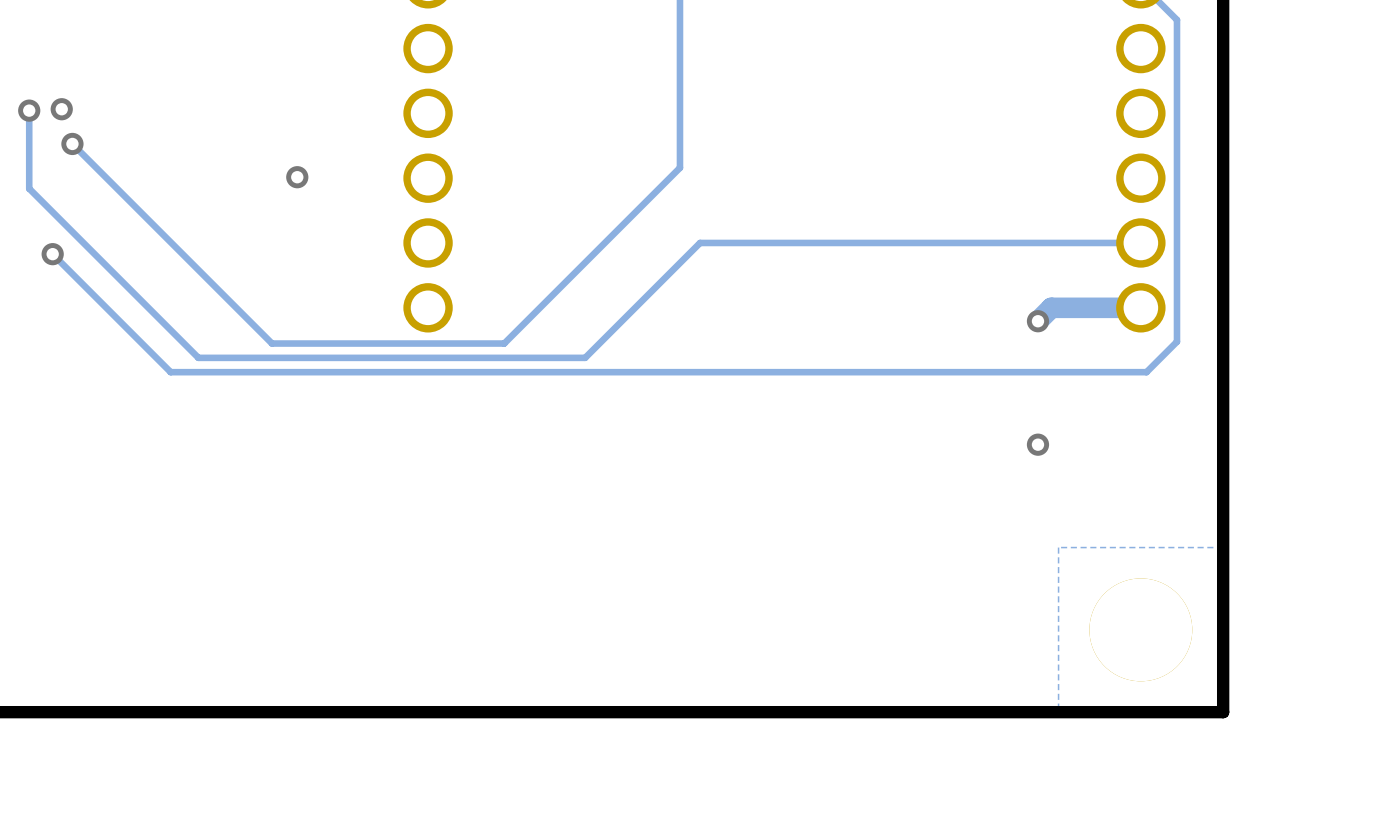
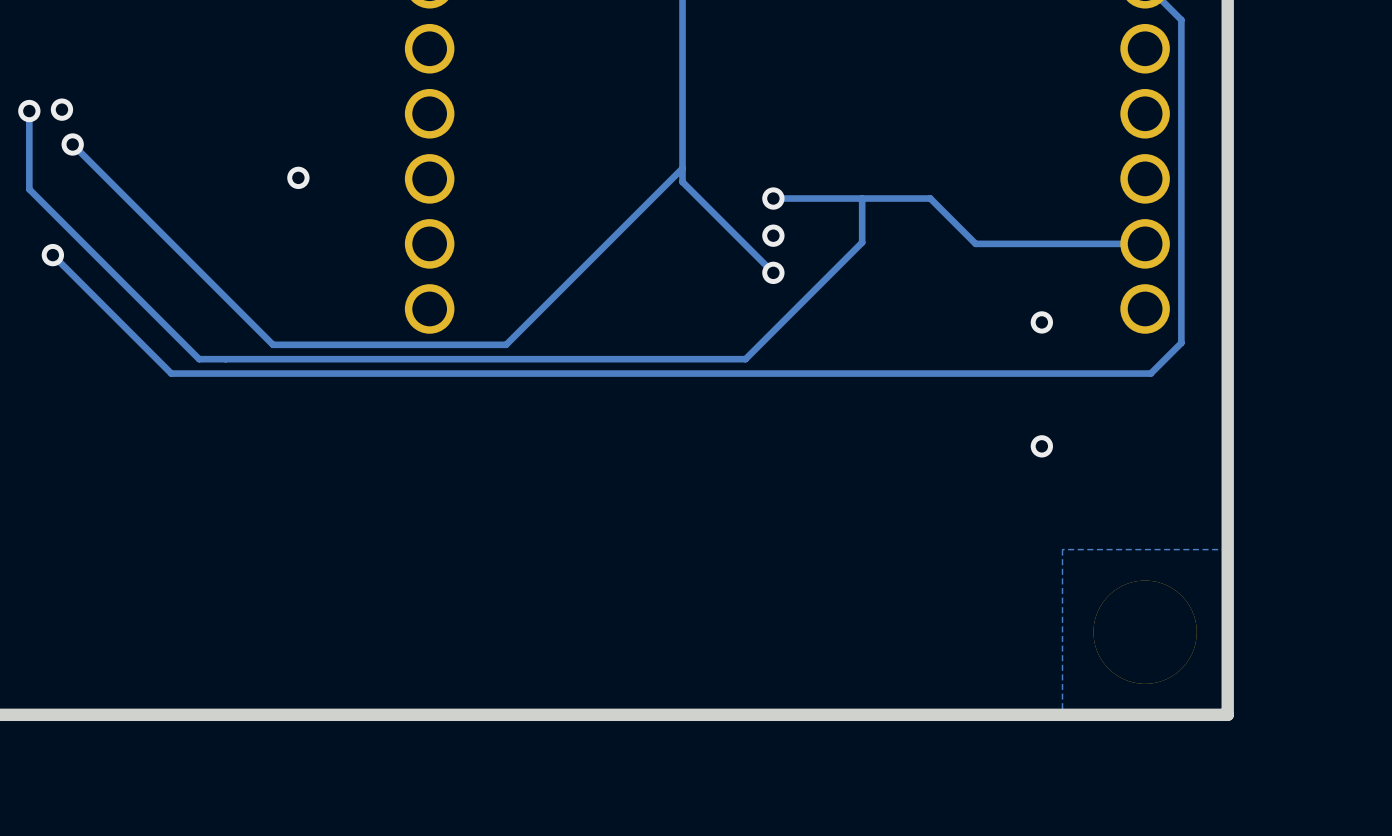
track: none -> (682, 168) (682, 182) (773, 272)
track: none -> (773, 198) (930, 198) (975, 243)
via: none -> (773, 198)
via: none -> (773, 235)
track: (972, 242) (700, 242) (585, 357) -> (862, 198) (862, 242) (745, 359) (587, 359)
via: none -> (773, 272)
track: (1140, 307) (1051, 307) (1037, 321) -> none

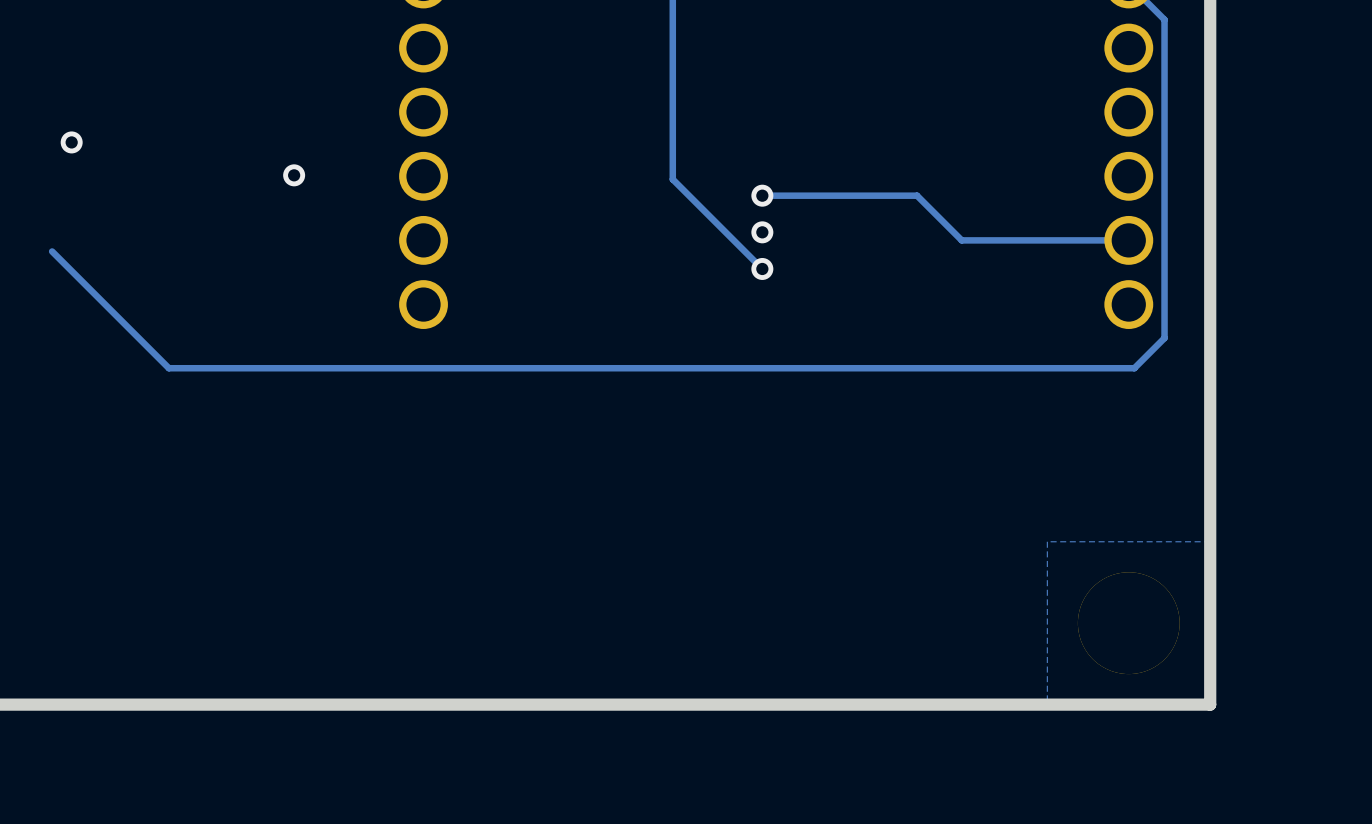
via: (61, 109) -> none
track: (29, 111) (29, 189) (199, 359) (745, 359) (862, 242) (862, 198) -> none
via: (29, 111) -> none
track: (72, 144) (273, 344) (506, 344) (682, 168) -> none
via: (52, 255) -> none
via: (1041, 322) -> none
via: (1041, 446) -> none

